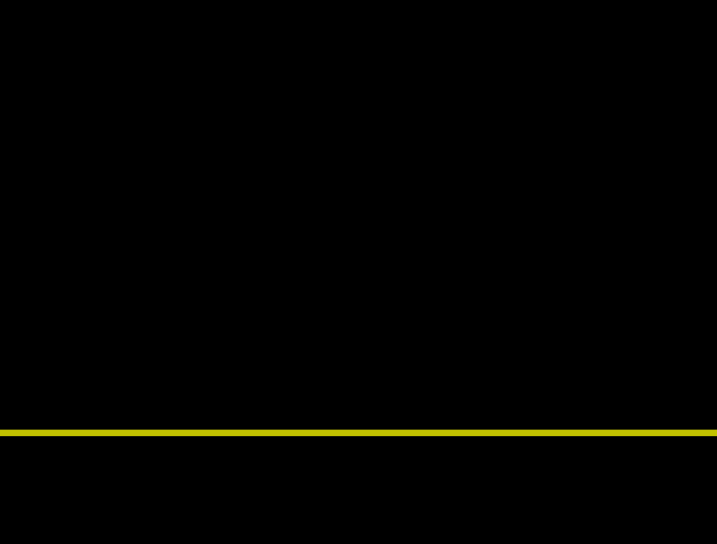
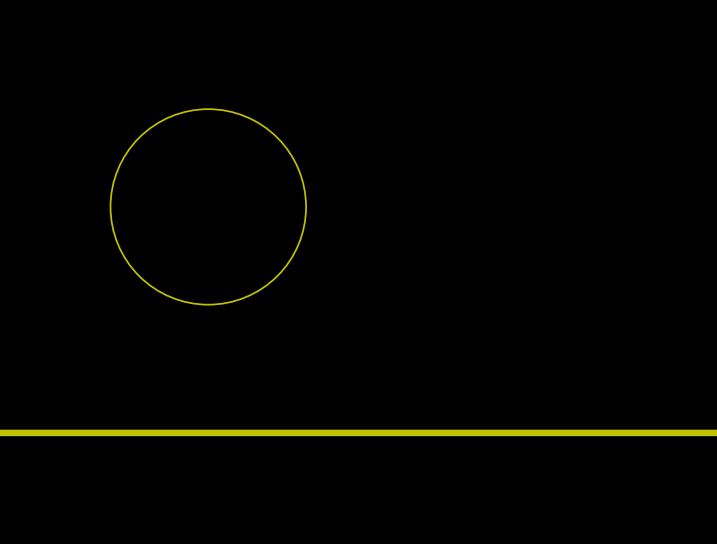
round board edge: none -> [109, 108, 307, 306]

